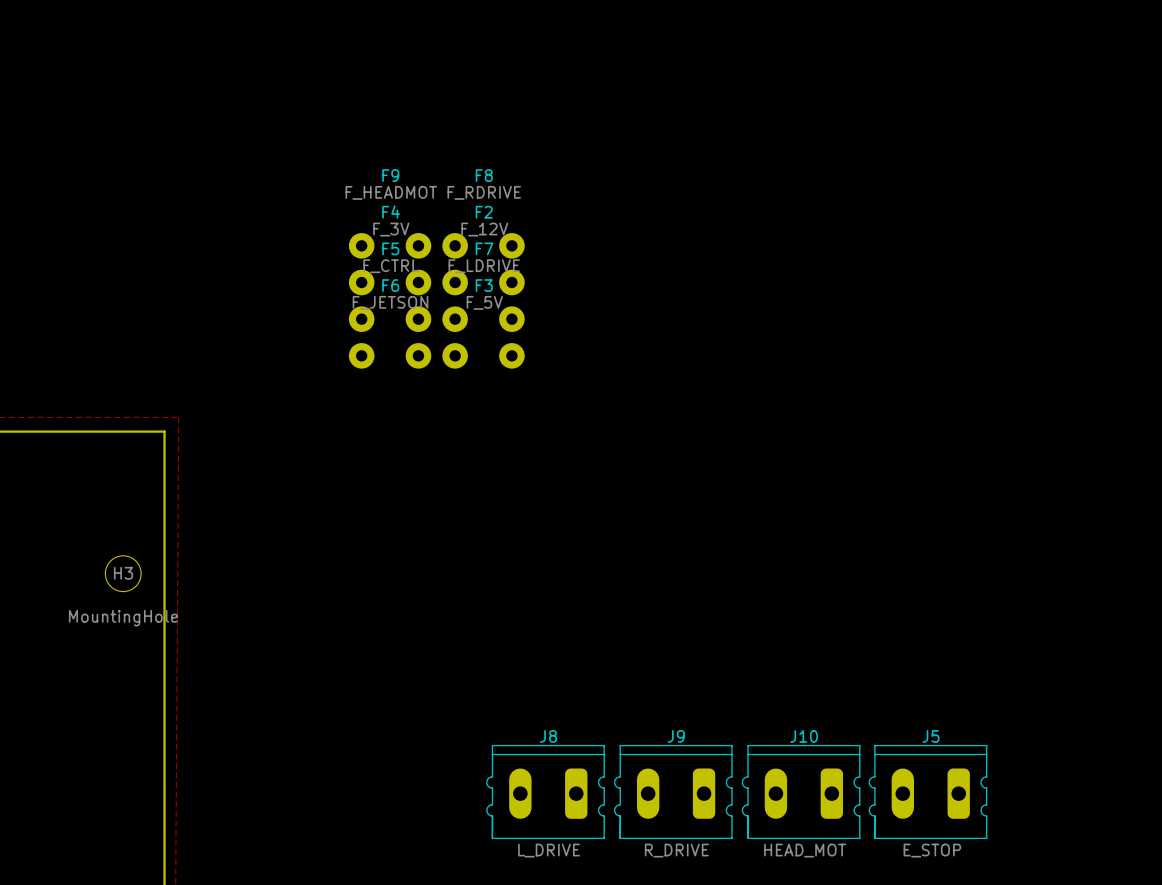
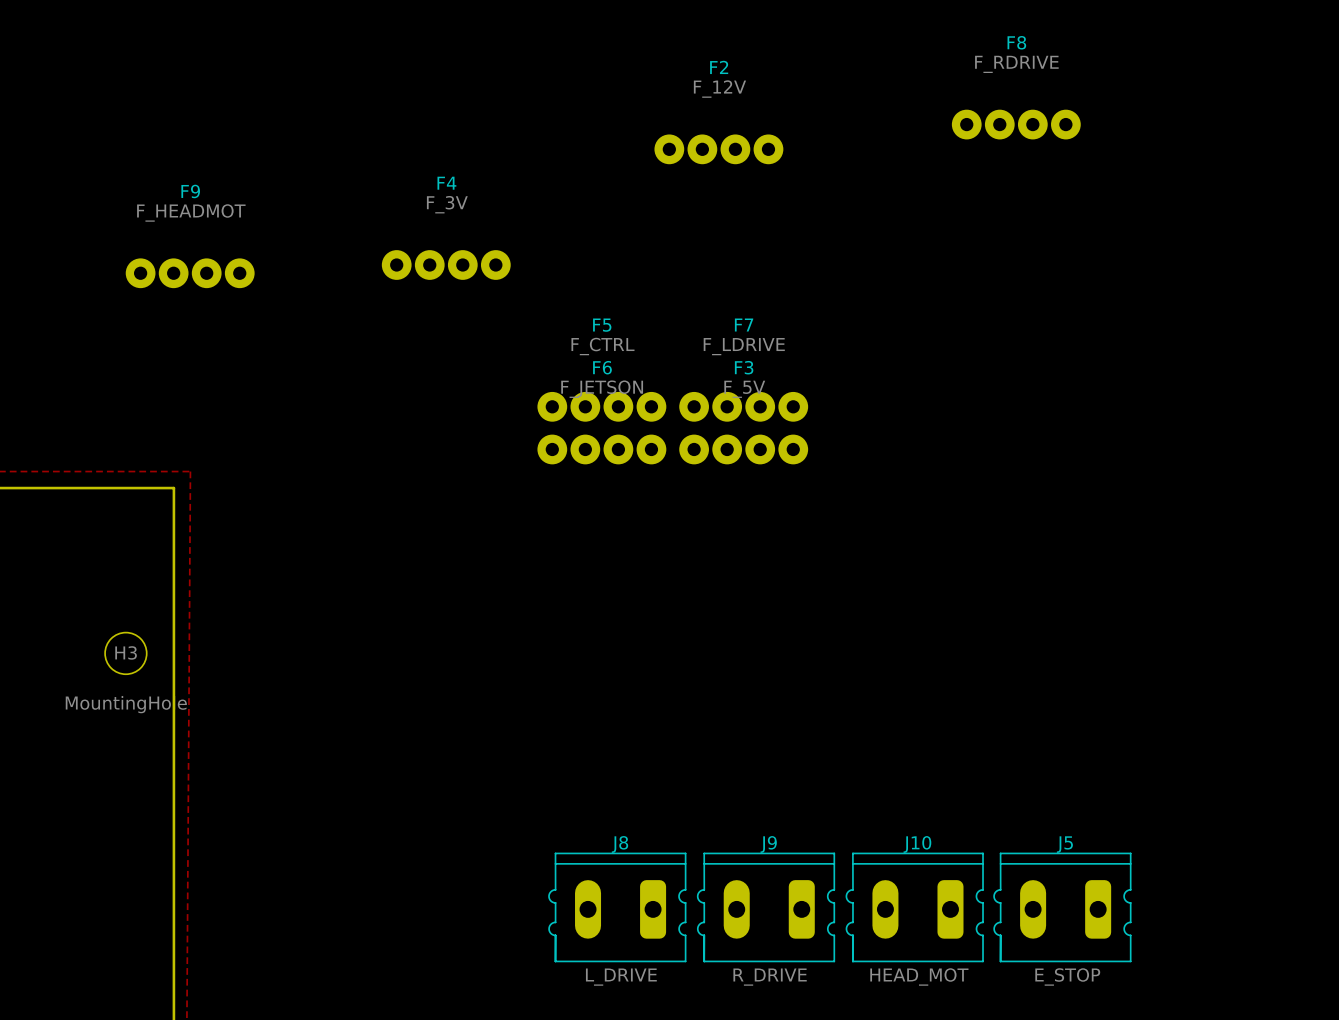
F9 footprint: [348, 233, 432, 259] -> [125, 258, 255, 289]
F8 footprint: [442, 233, 525, 259] -> [951, 109, 1081, 140]
F4 footprint: [348, 269, 432, 296] -> [381, 250, 511, 280]
F2 footprint: [442, 269, 525, 296] -> [654, 134, 784, 165]
F5 footprint: [348, 306, 432, 332] -> [537, 391, 667, 422]
F7 footprint: [442, 306, 525, 332] -> [679, 391, 809, 422]
F6 footprint: [348, 343, 432, 369] -> [537, 434, 667, 465]
F3 footprint: [442, 343, 525, 369] -> [679, 434, 809, 465]

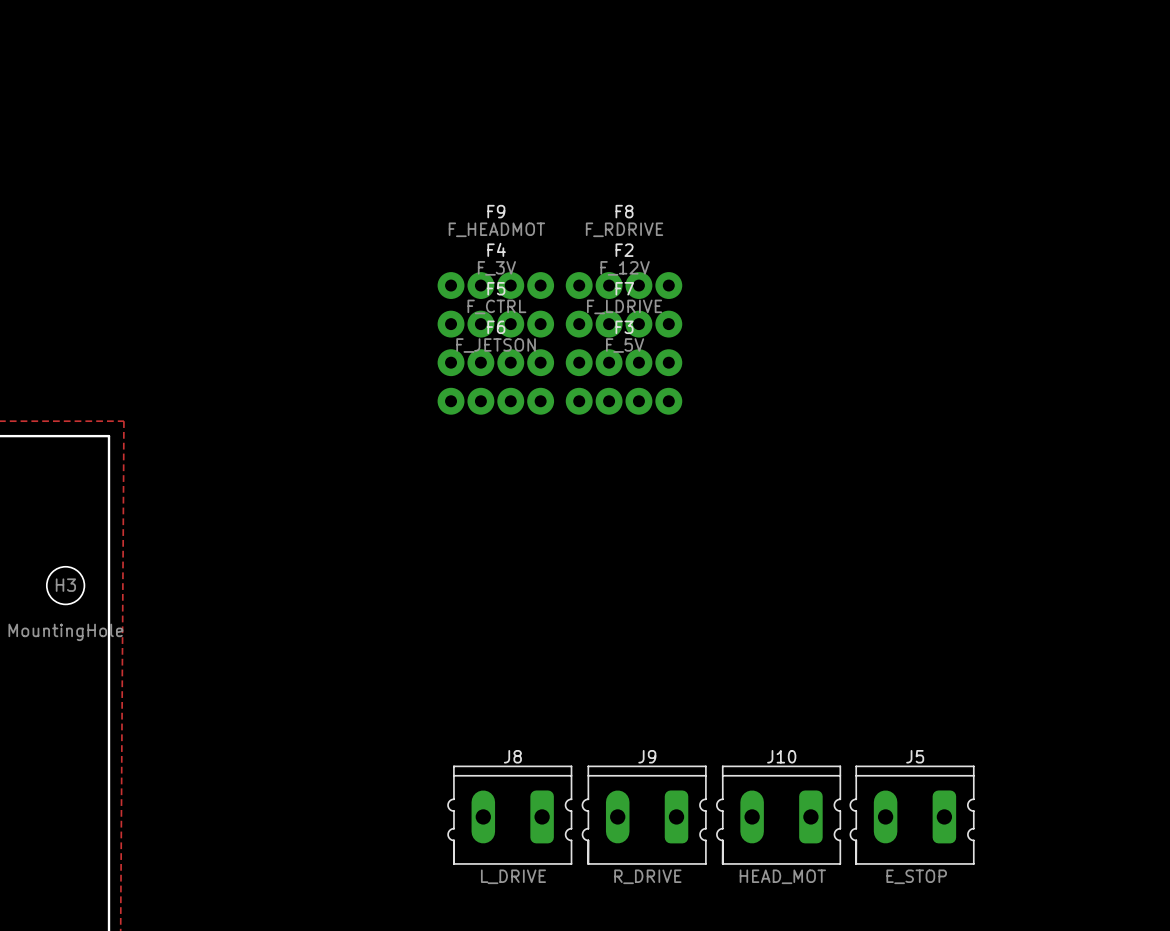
F8 position: (1016, 124) -> (624, 285)
F2 position: (718, 149) -> (624, 324)
F4 position: (446, 265) -> (495, 324)
F9 position: (190, 273) -> (495, 285)

